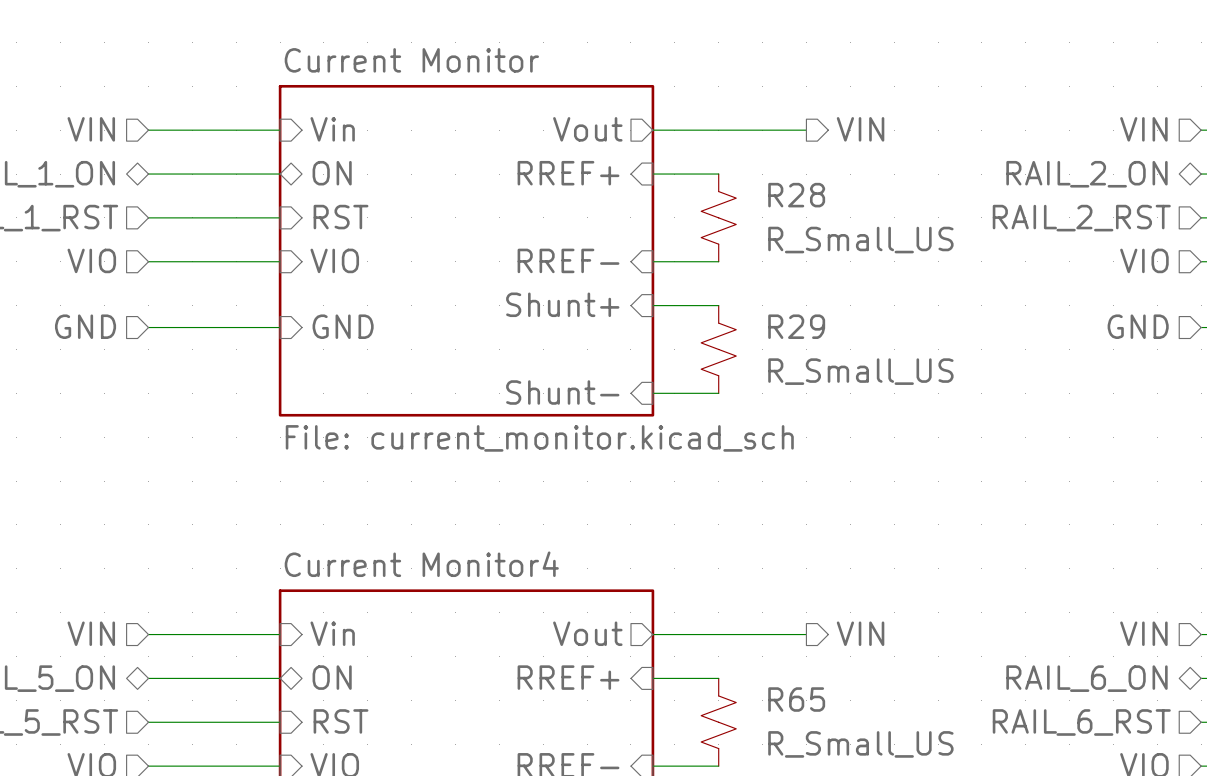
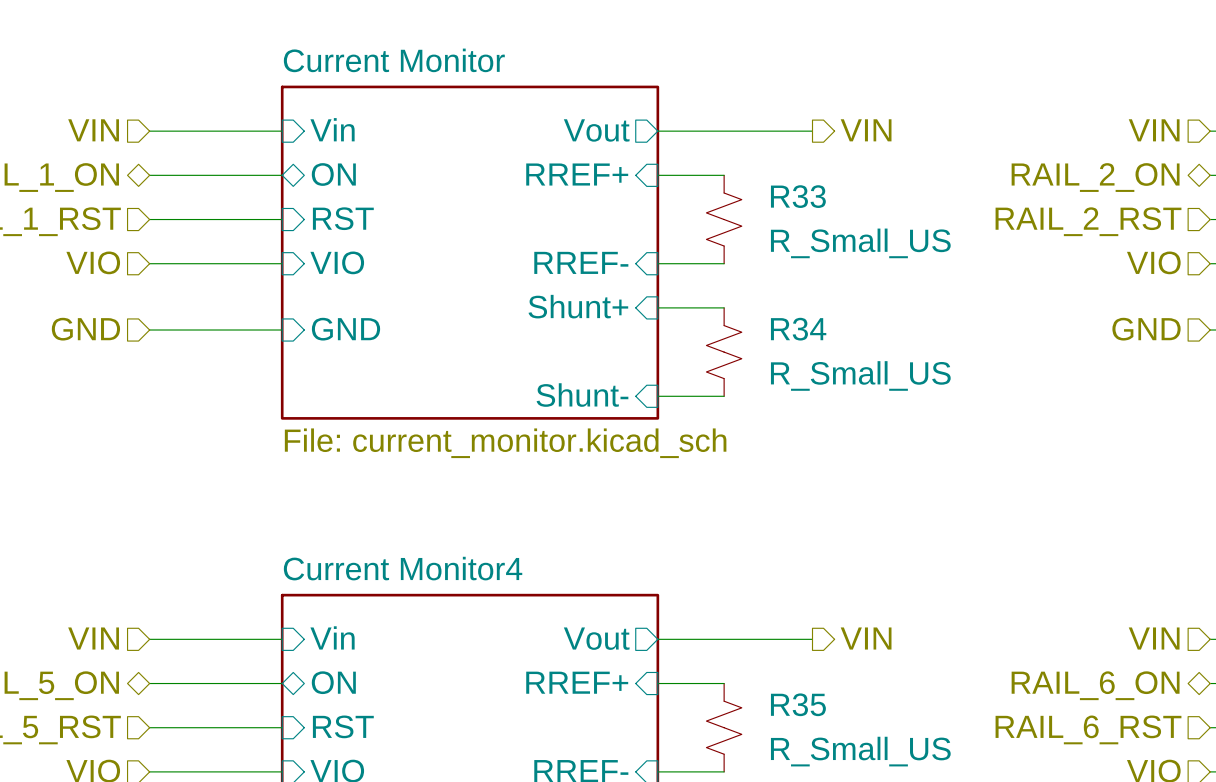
R28 name: R28 (796, 195) -> R33 (798, 196)
R29 name: R29 (796, 326) -> R34 (798, 329)
R65 name: R65 (796, 699) -> R35 (798, 704)

